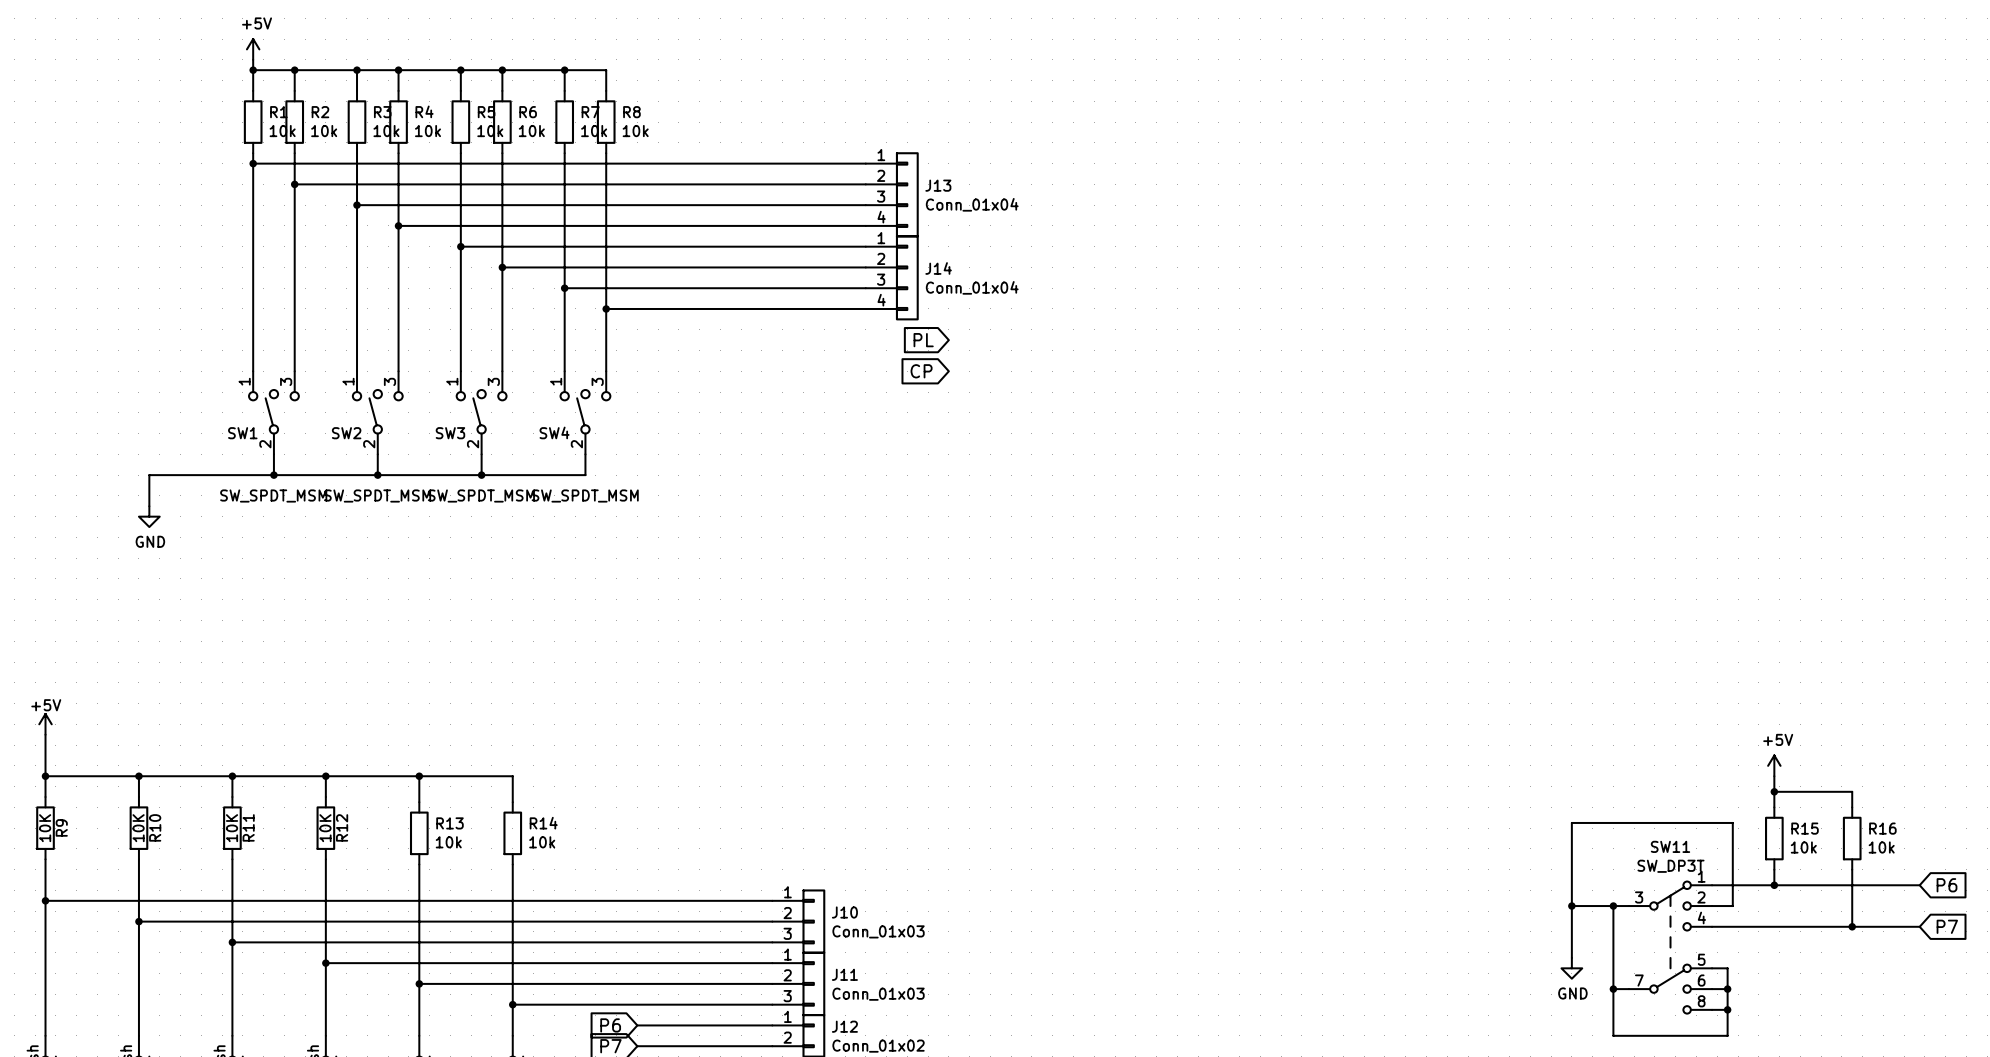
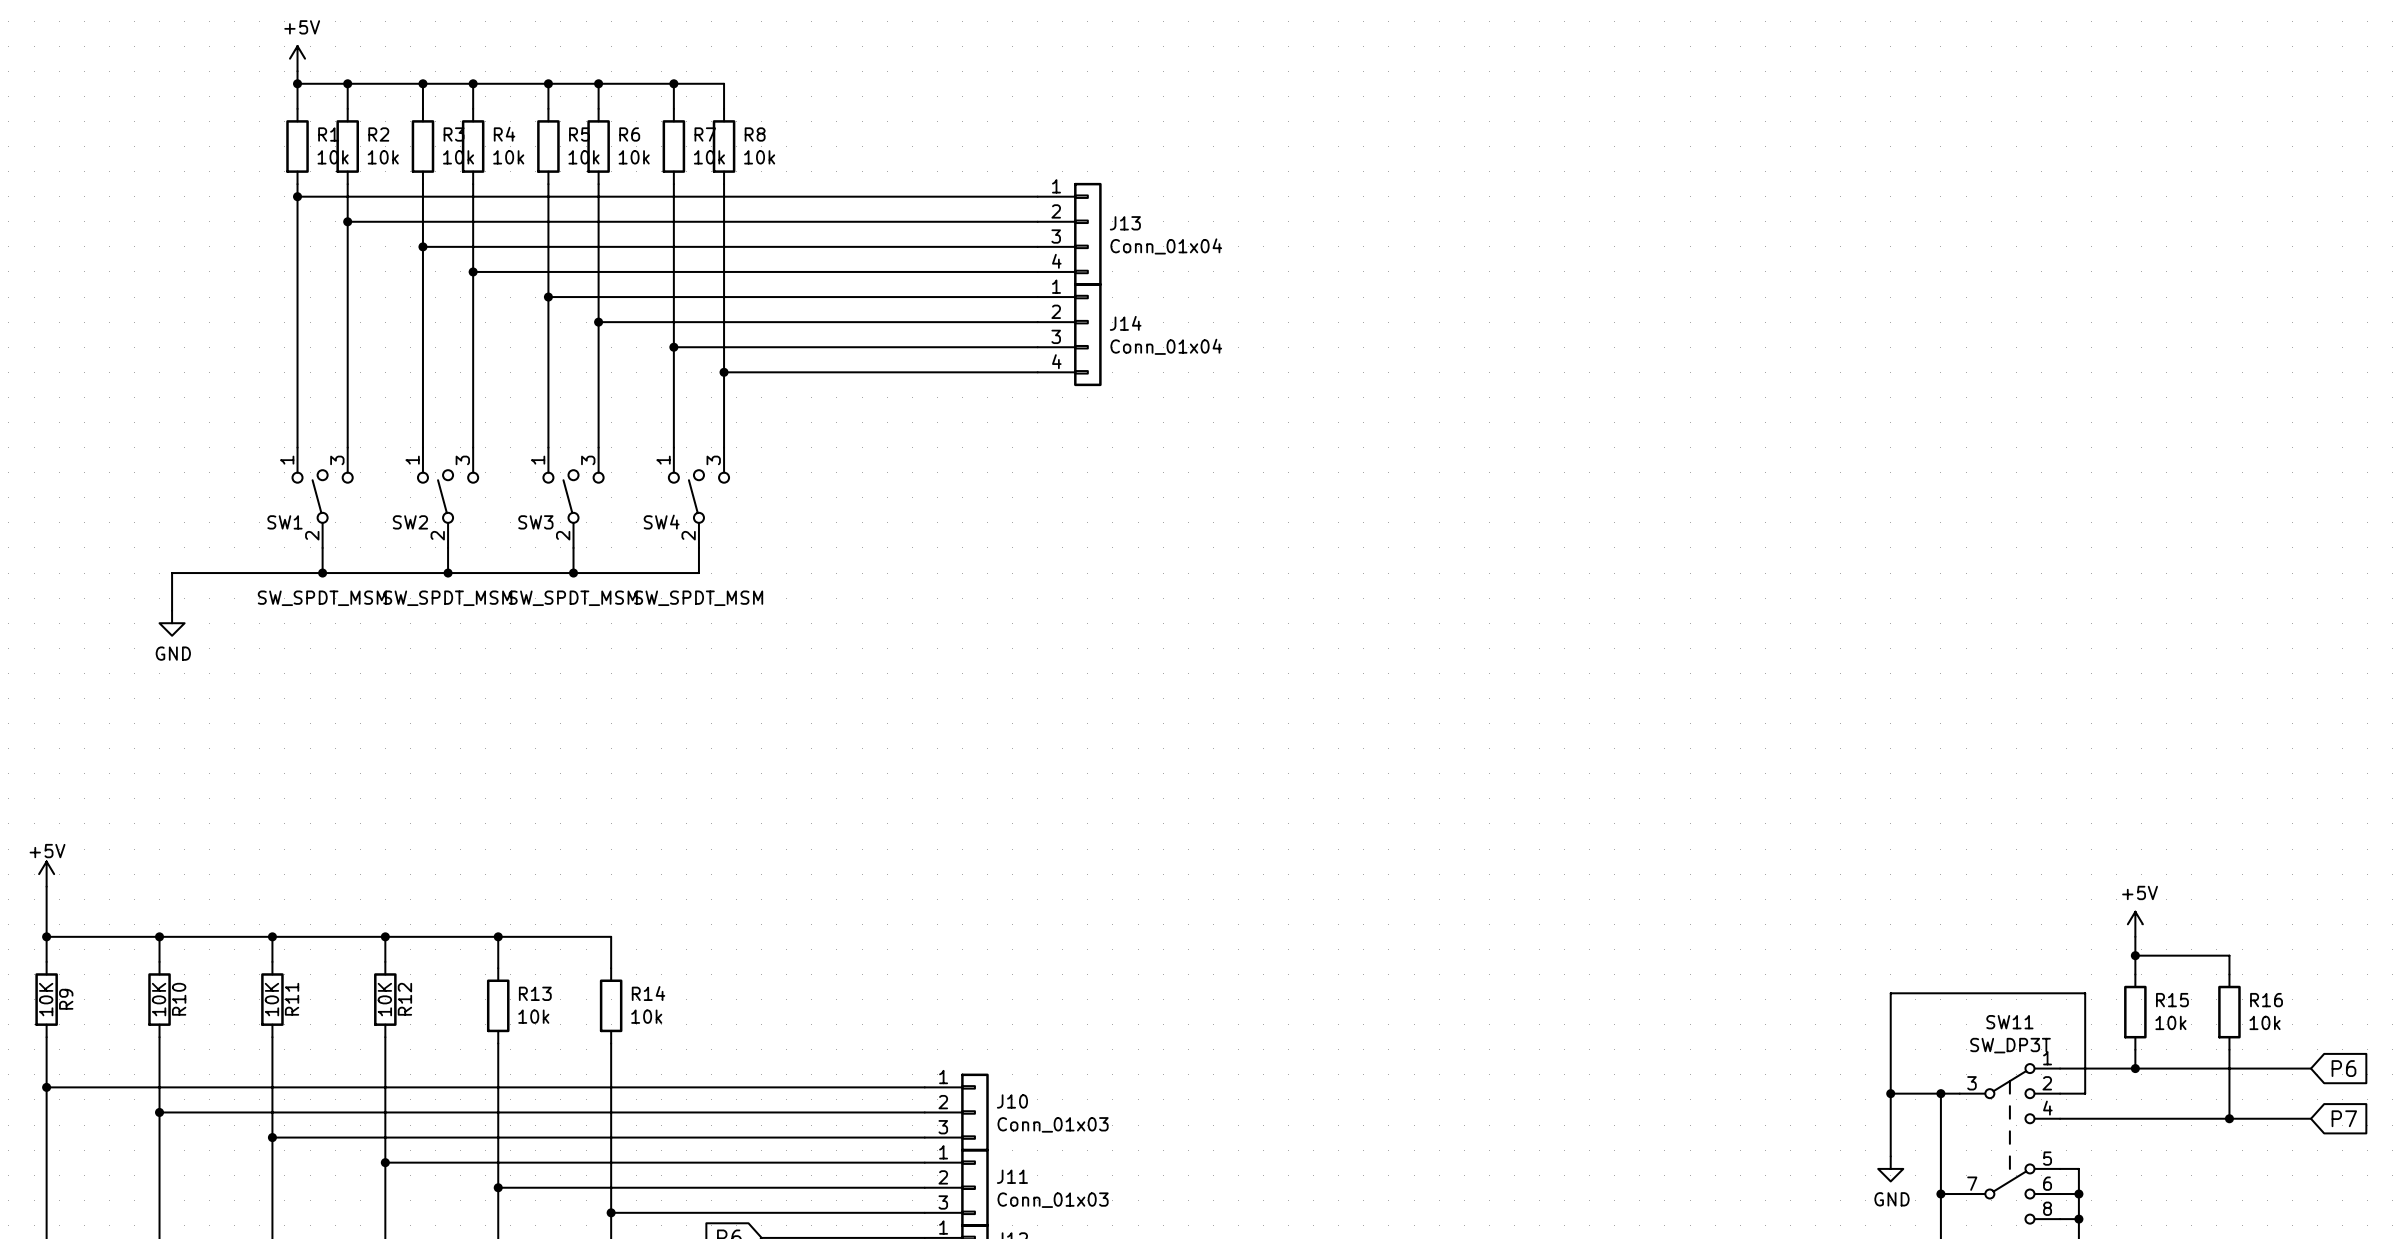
global label: PL (923, 340) -> none
global label: CP (921, 371) -> none

